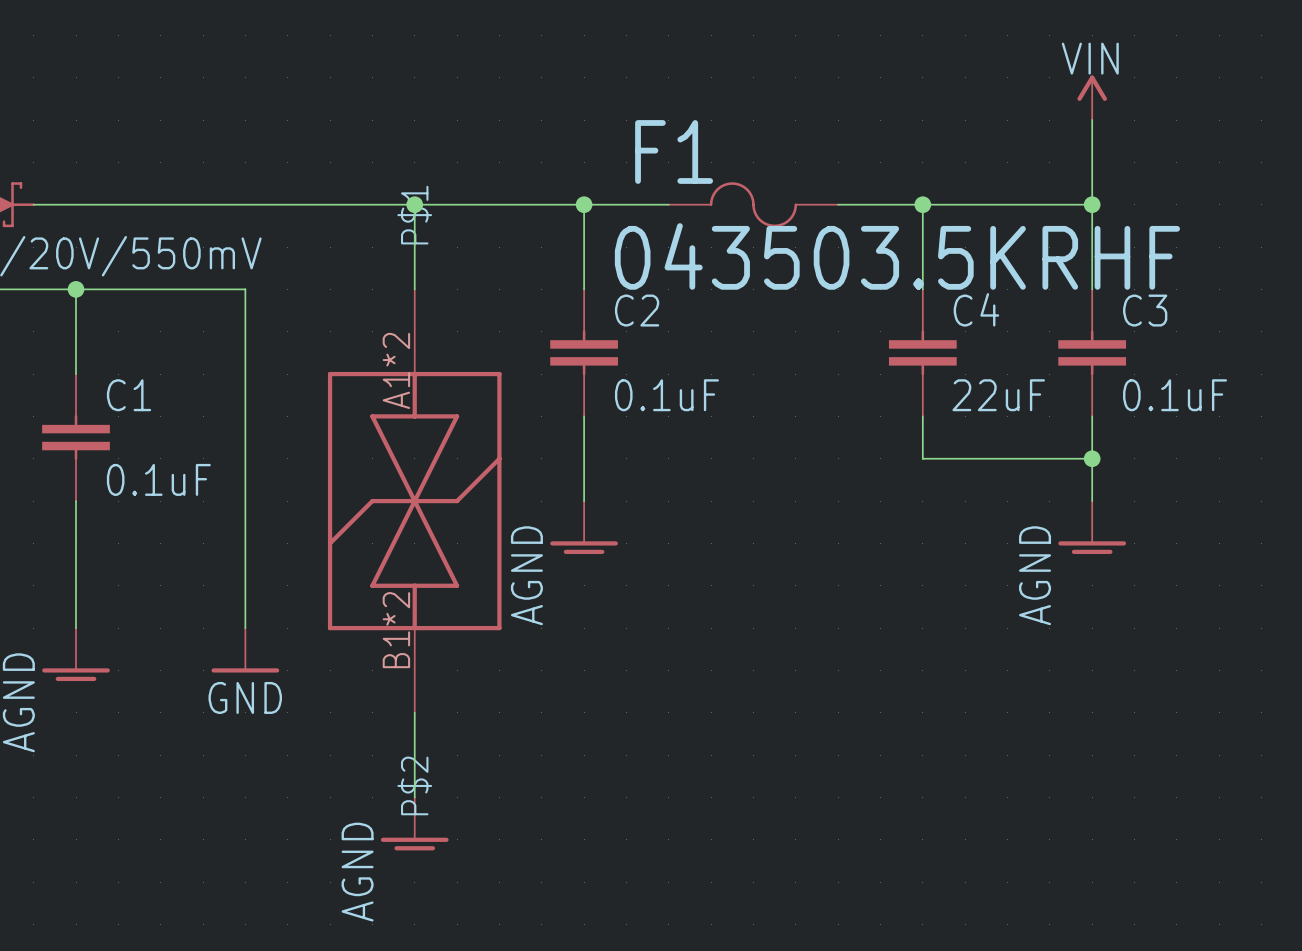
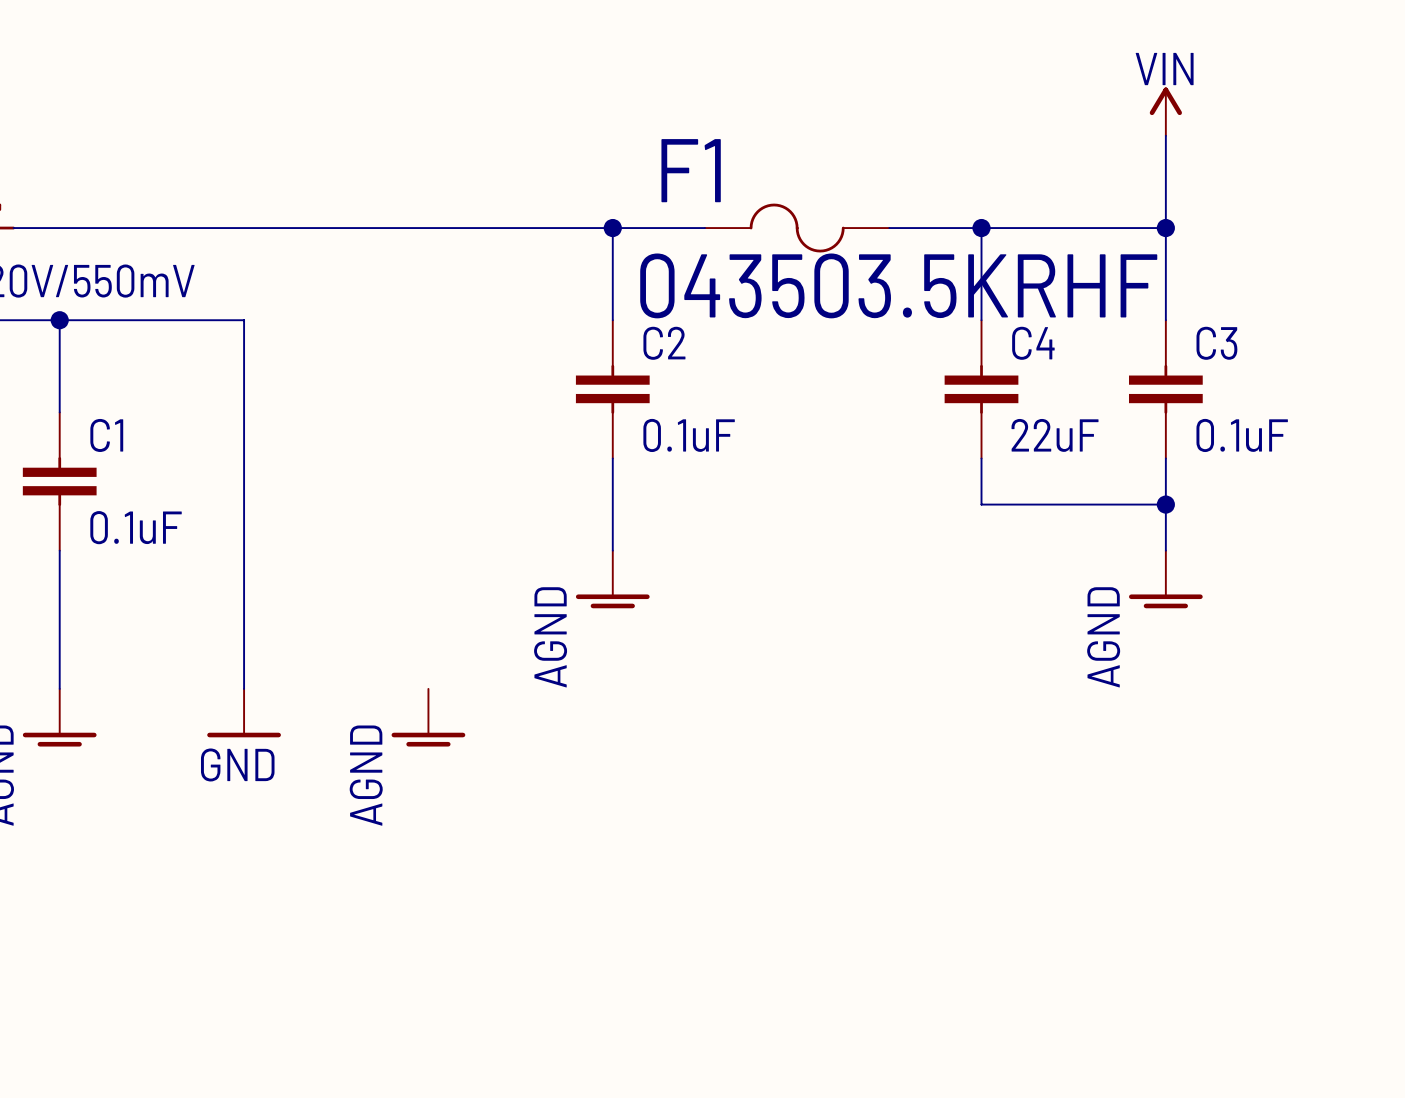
wire: (414, 204) (414, 289) -> none
junction: (414, 204) -> none
part: (414, 501) -> none
wire: (414, 712) (414, 797) -> none
power symbol position: AGND (414, 823) -> AGND (428, 717)

